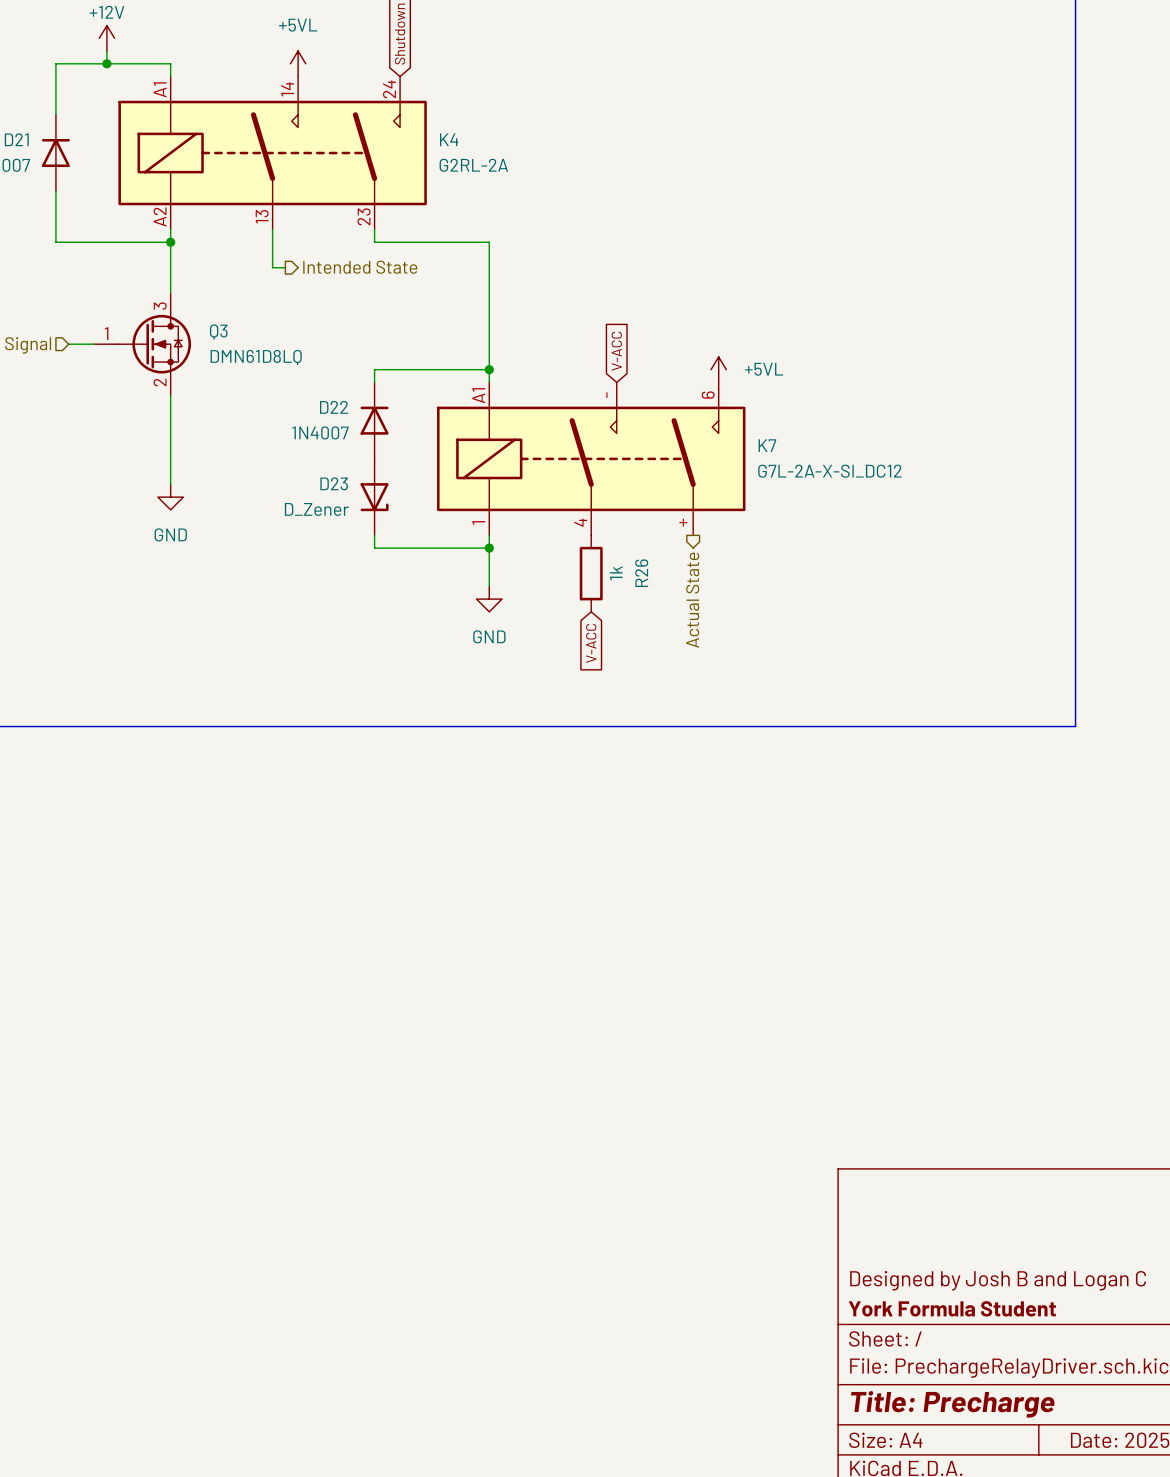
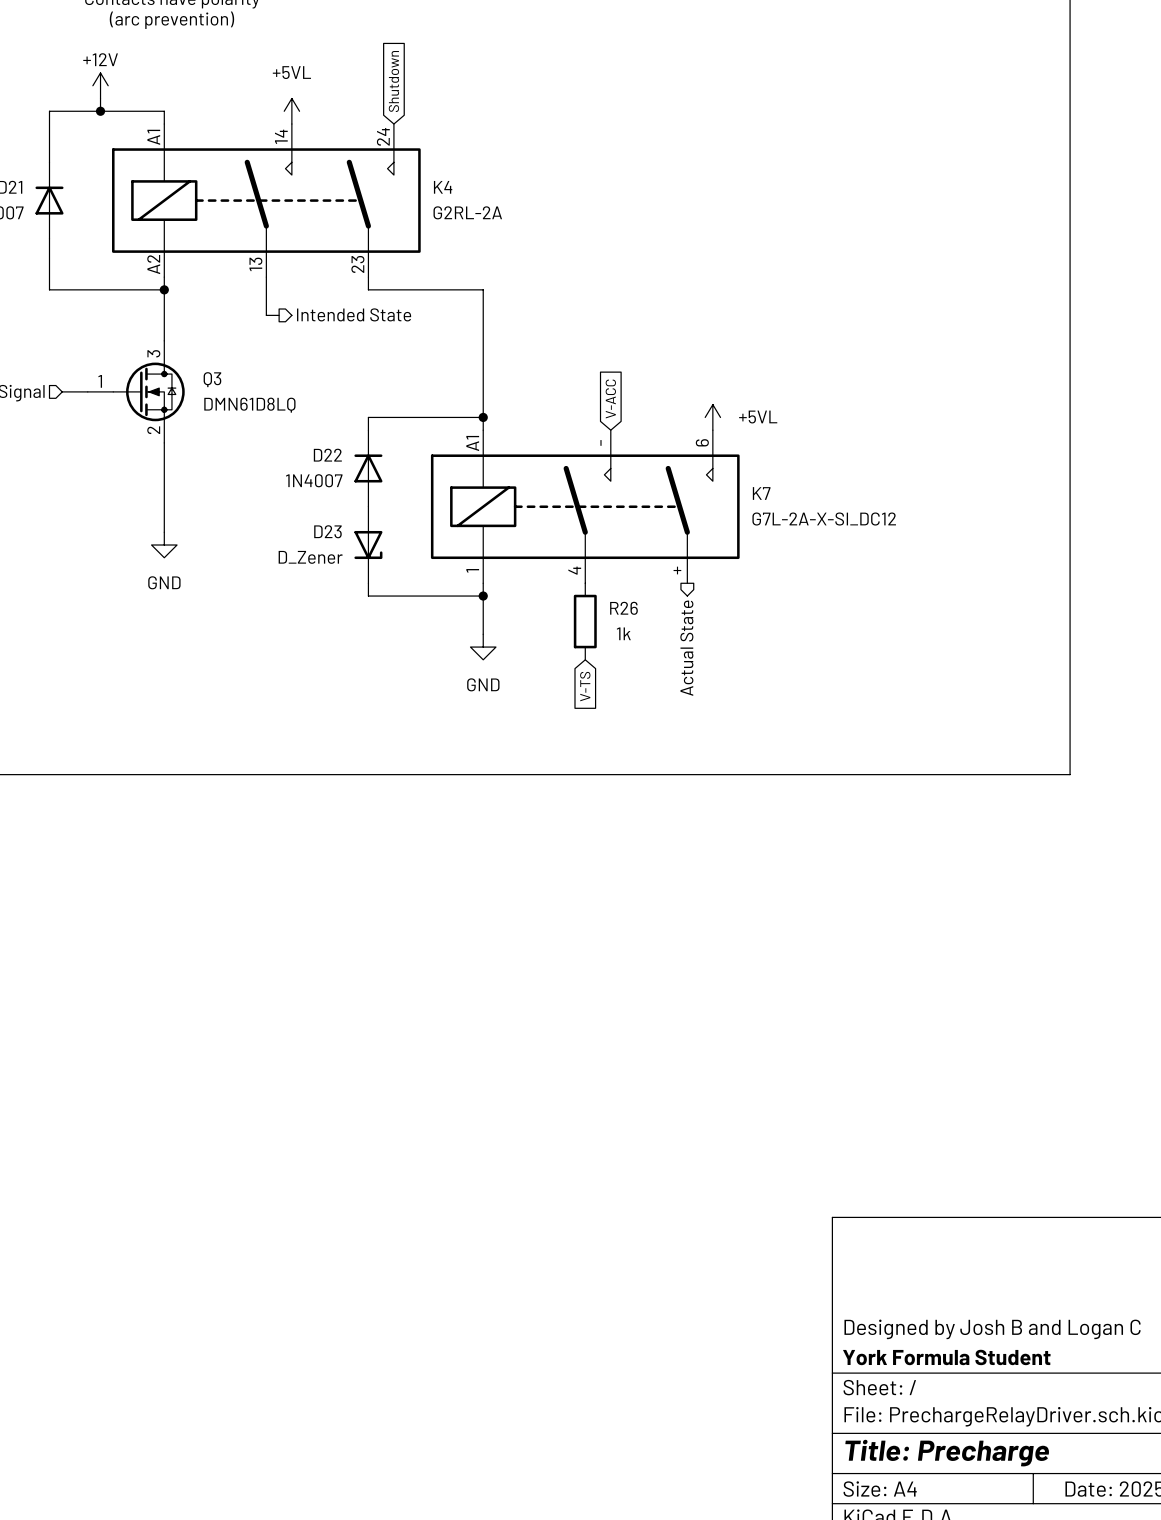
R26 value rotation: 0° (616, 573) -> 90° clockwise (623, 633)
R26 name rotation: 0° (641, 573) -> 90° clockwise (623, 608)
global label: V-ACC (591, 643) -> V-TS (585, 686)

